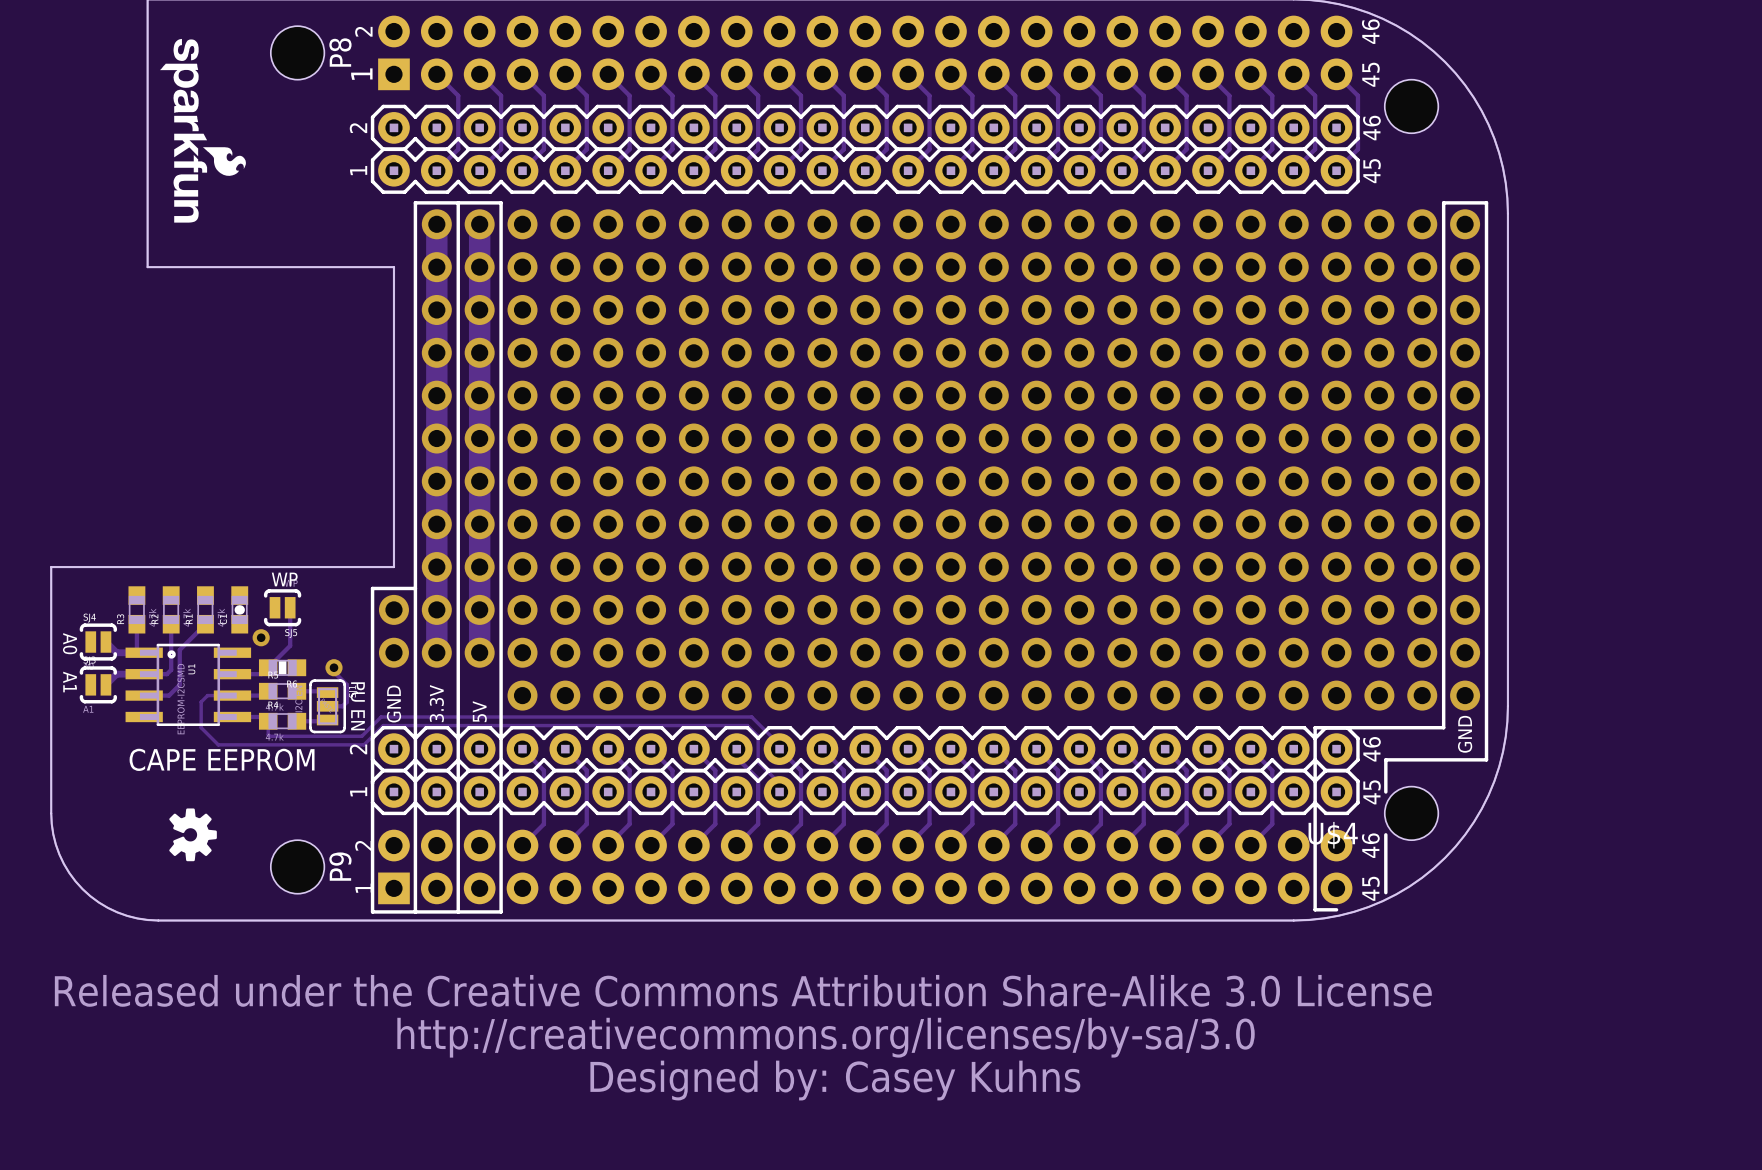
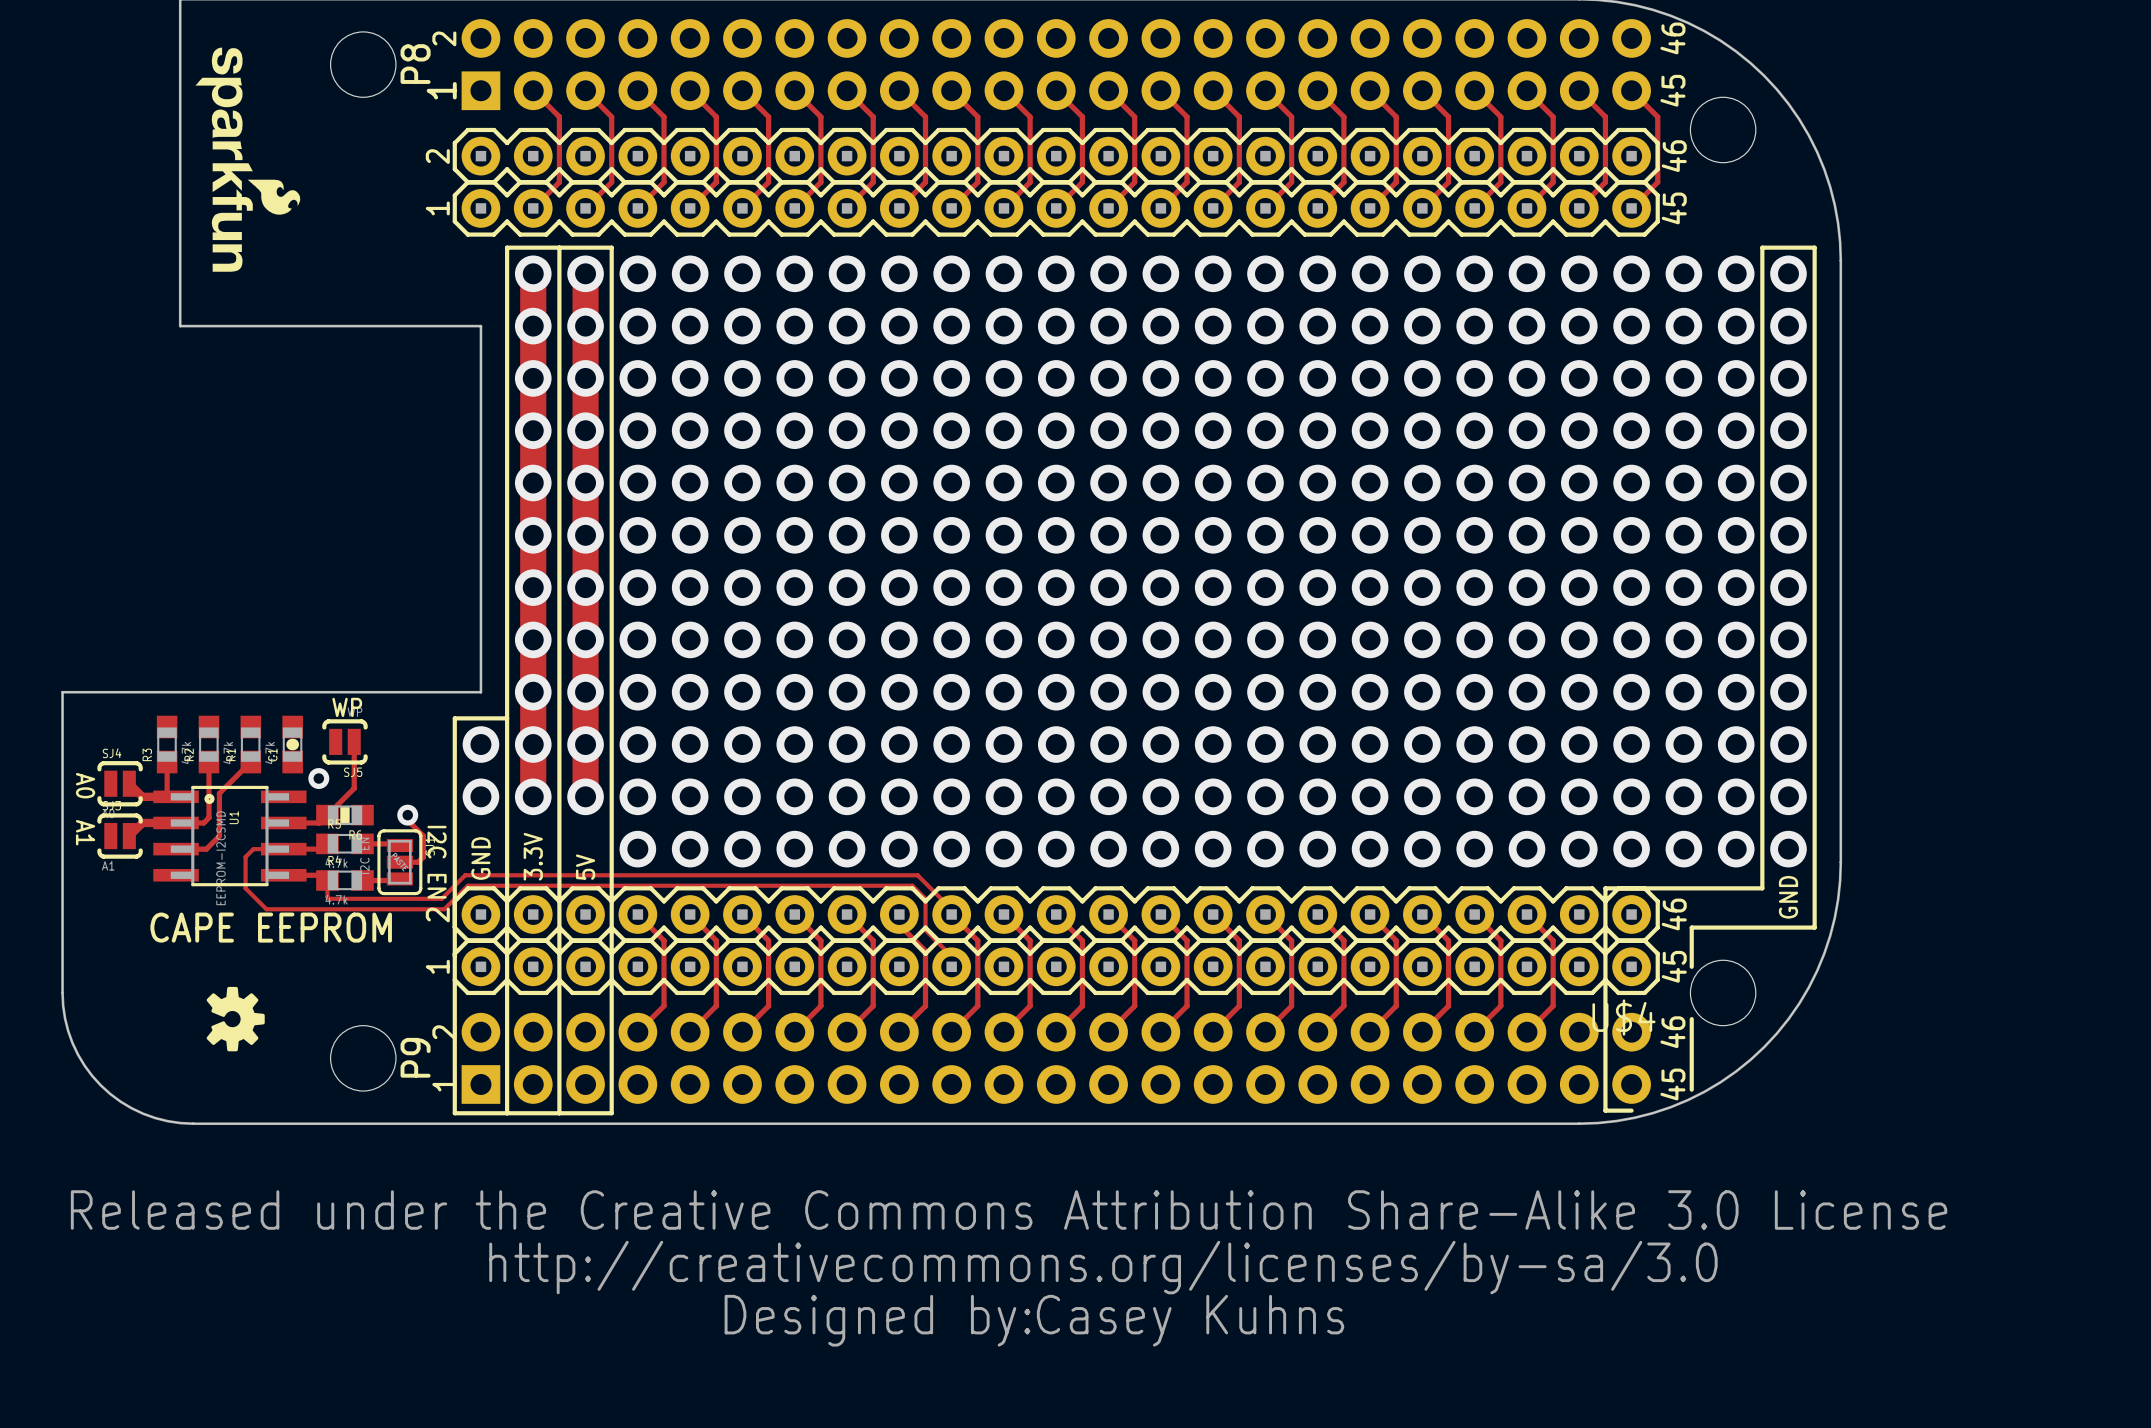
text: PU EN (357, 706) -> I2C EN (437, 862)

